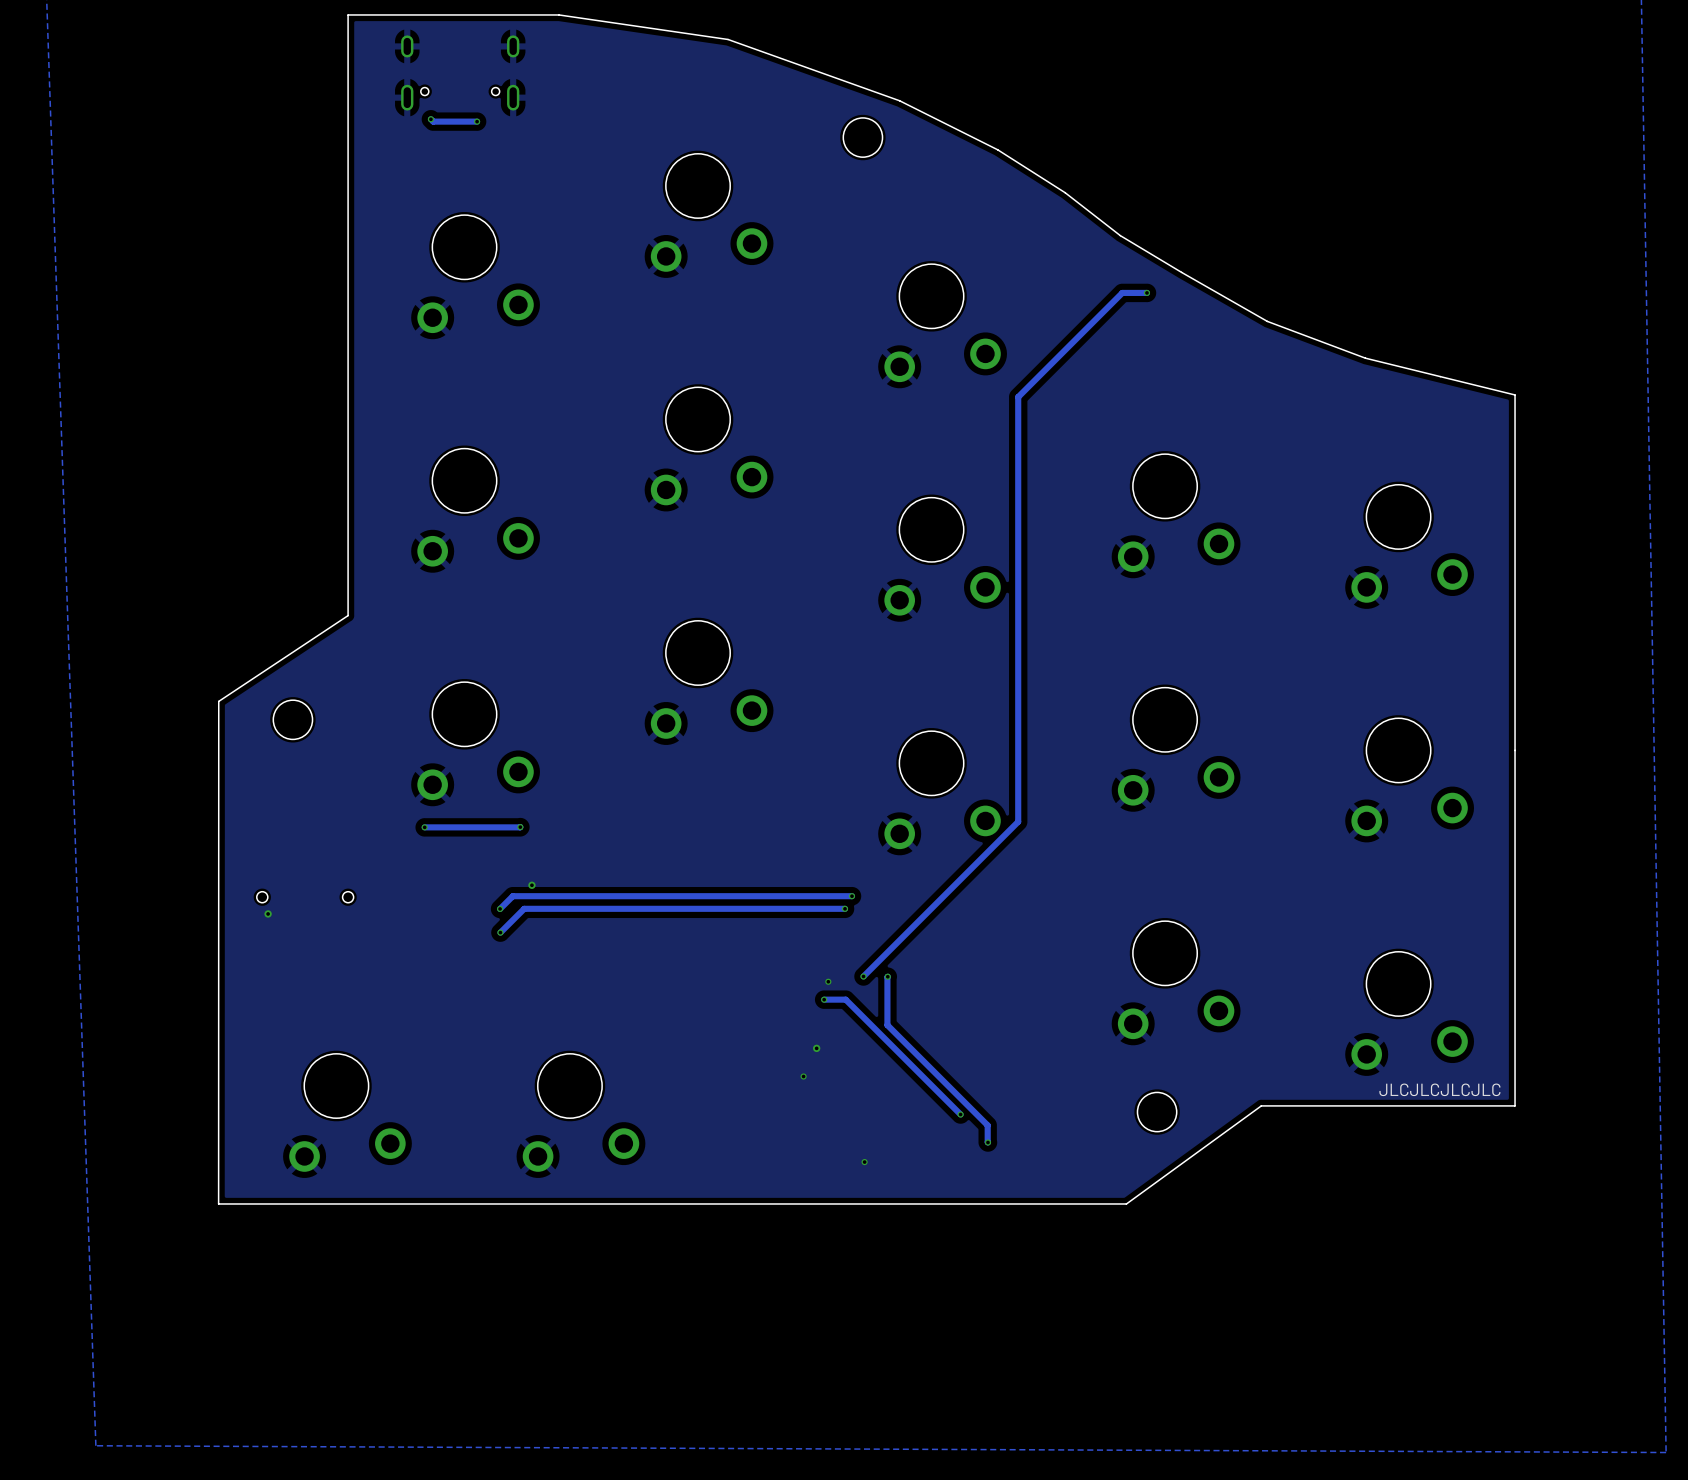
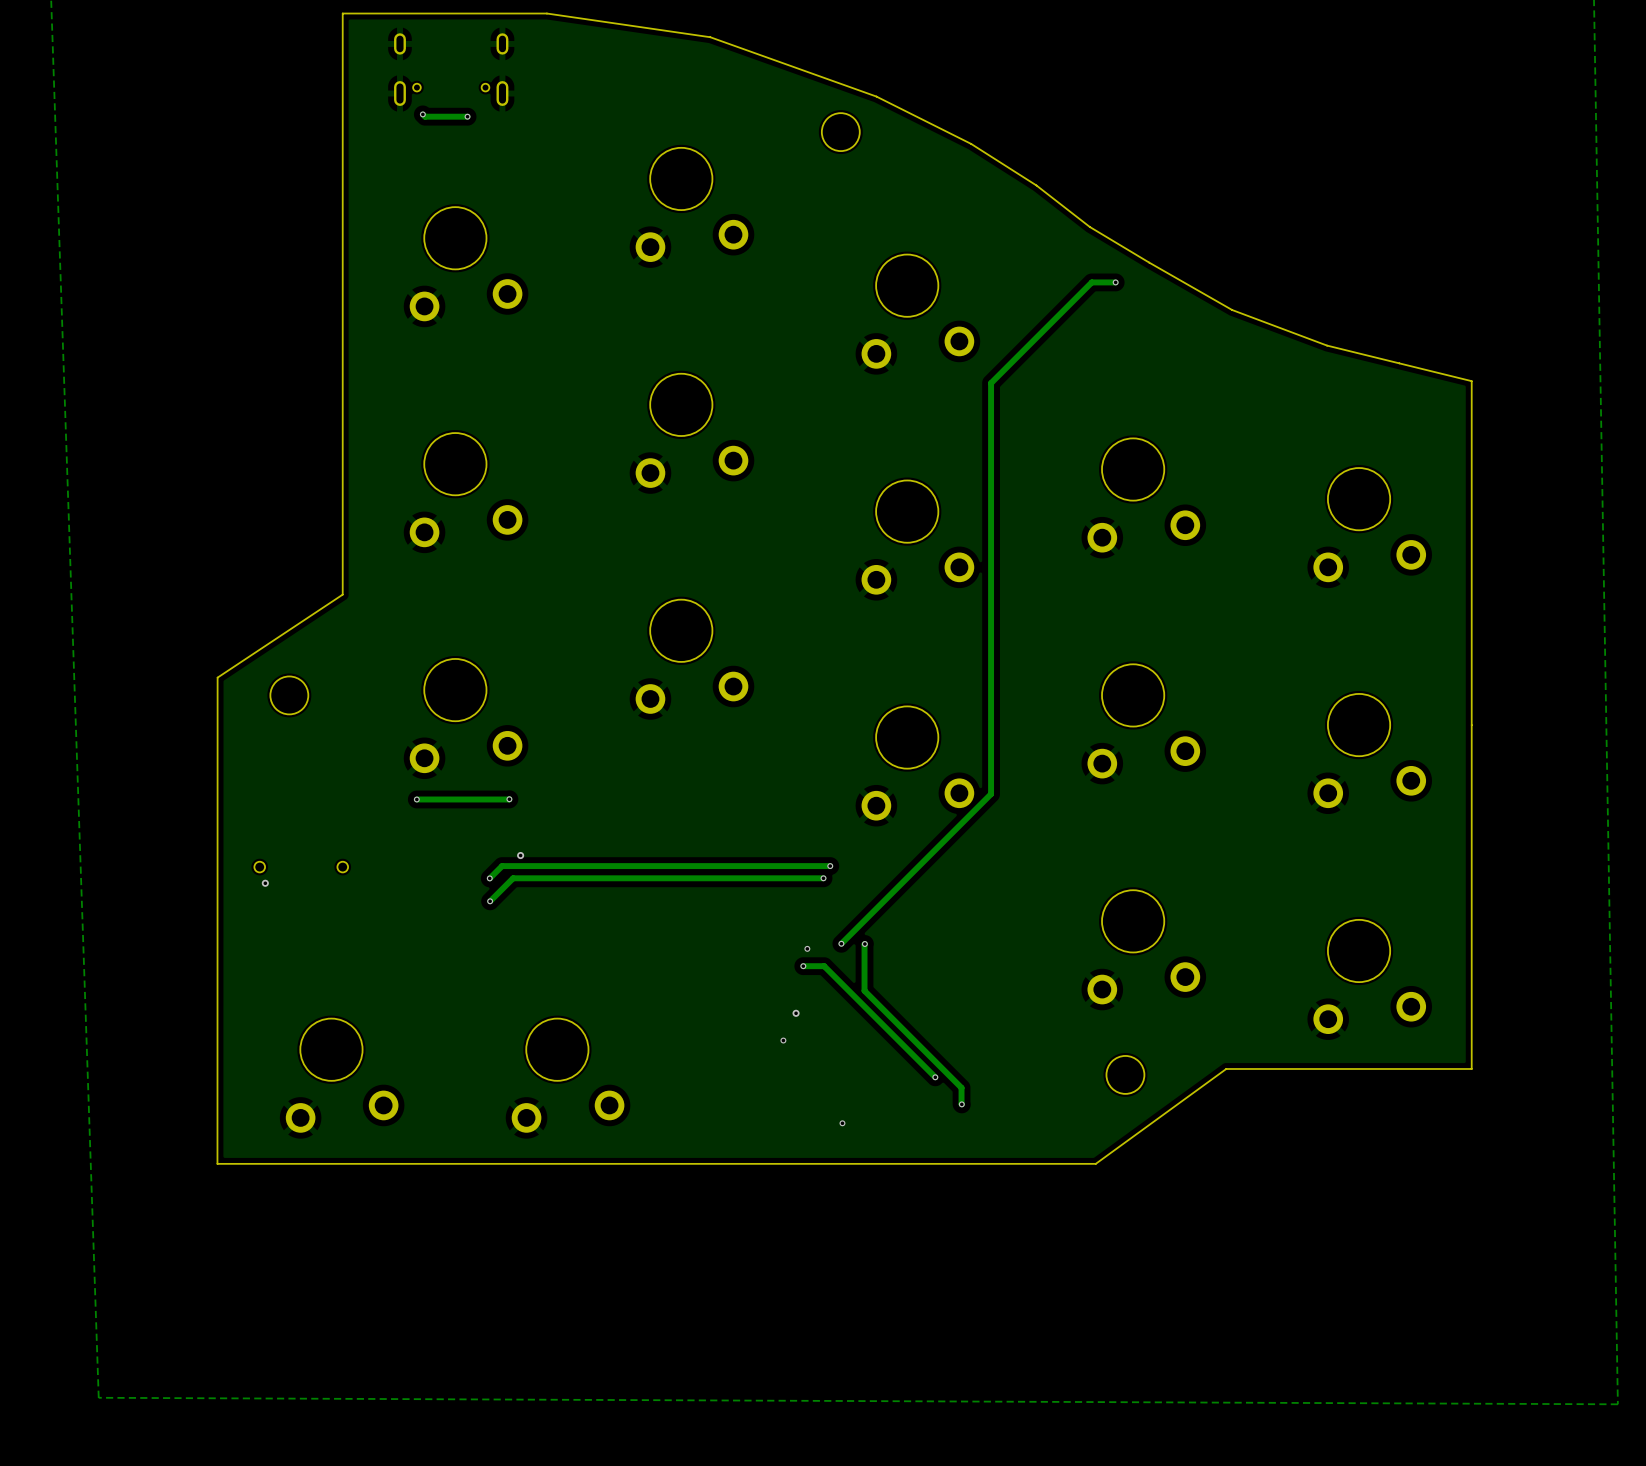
text: JLCJLCJLCJLC (1439, 1089) -> none

